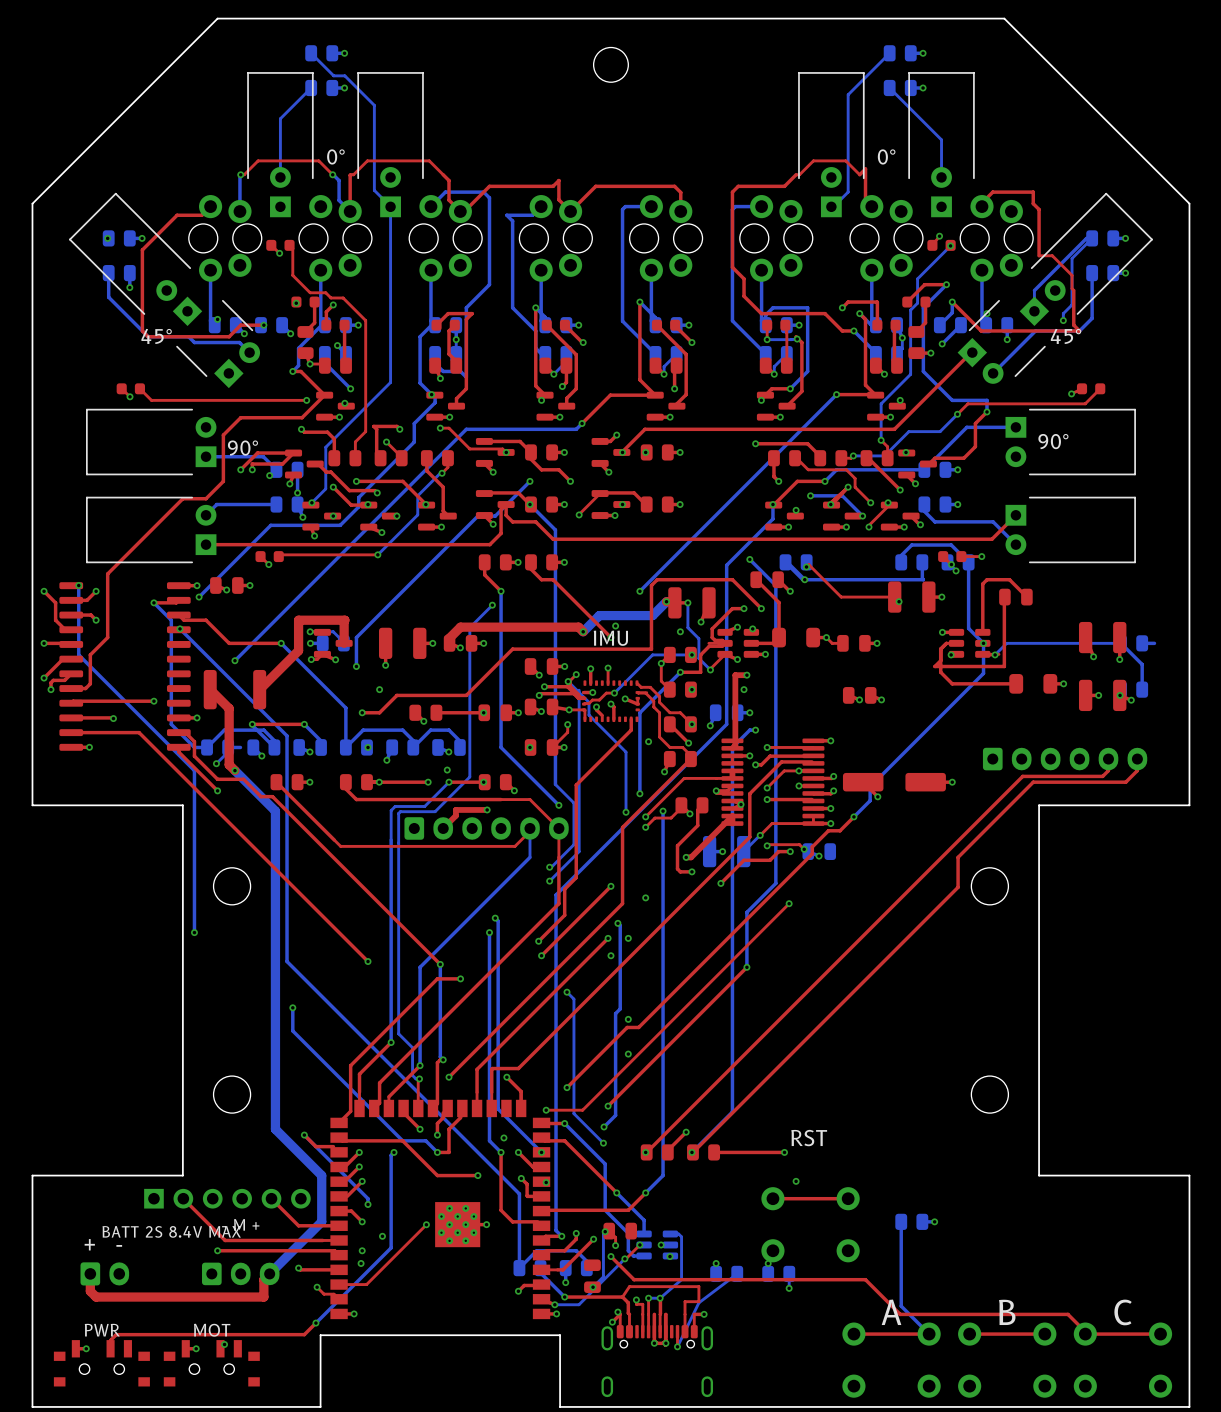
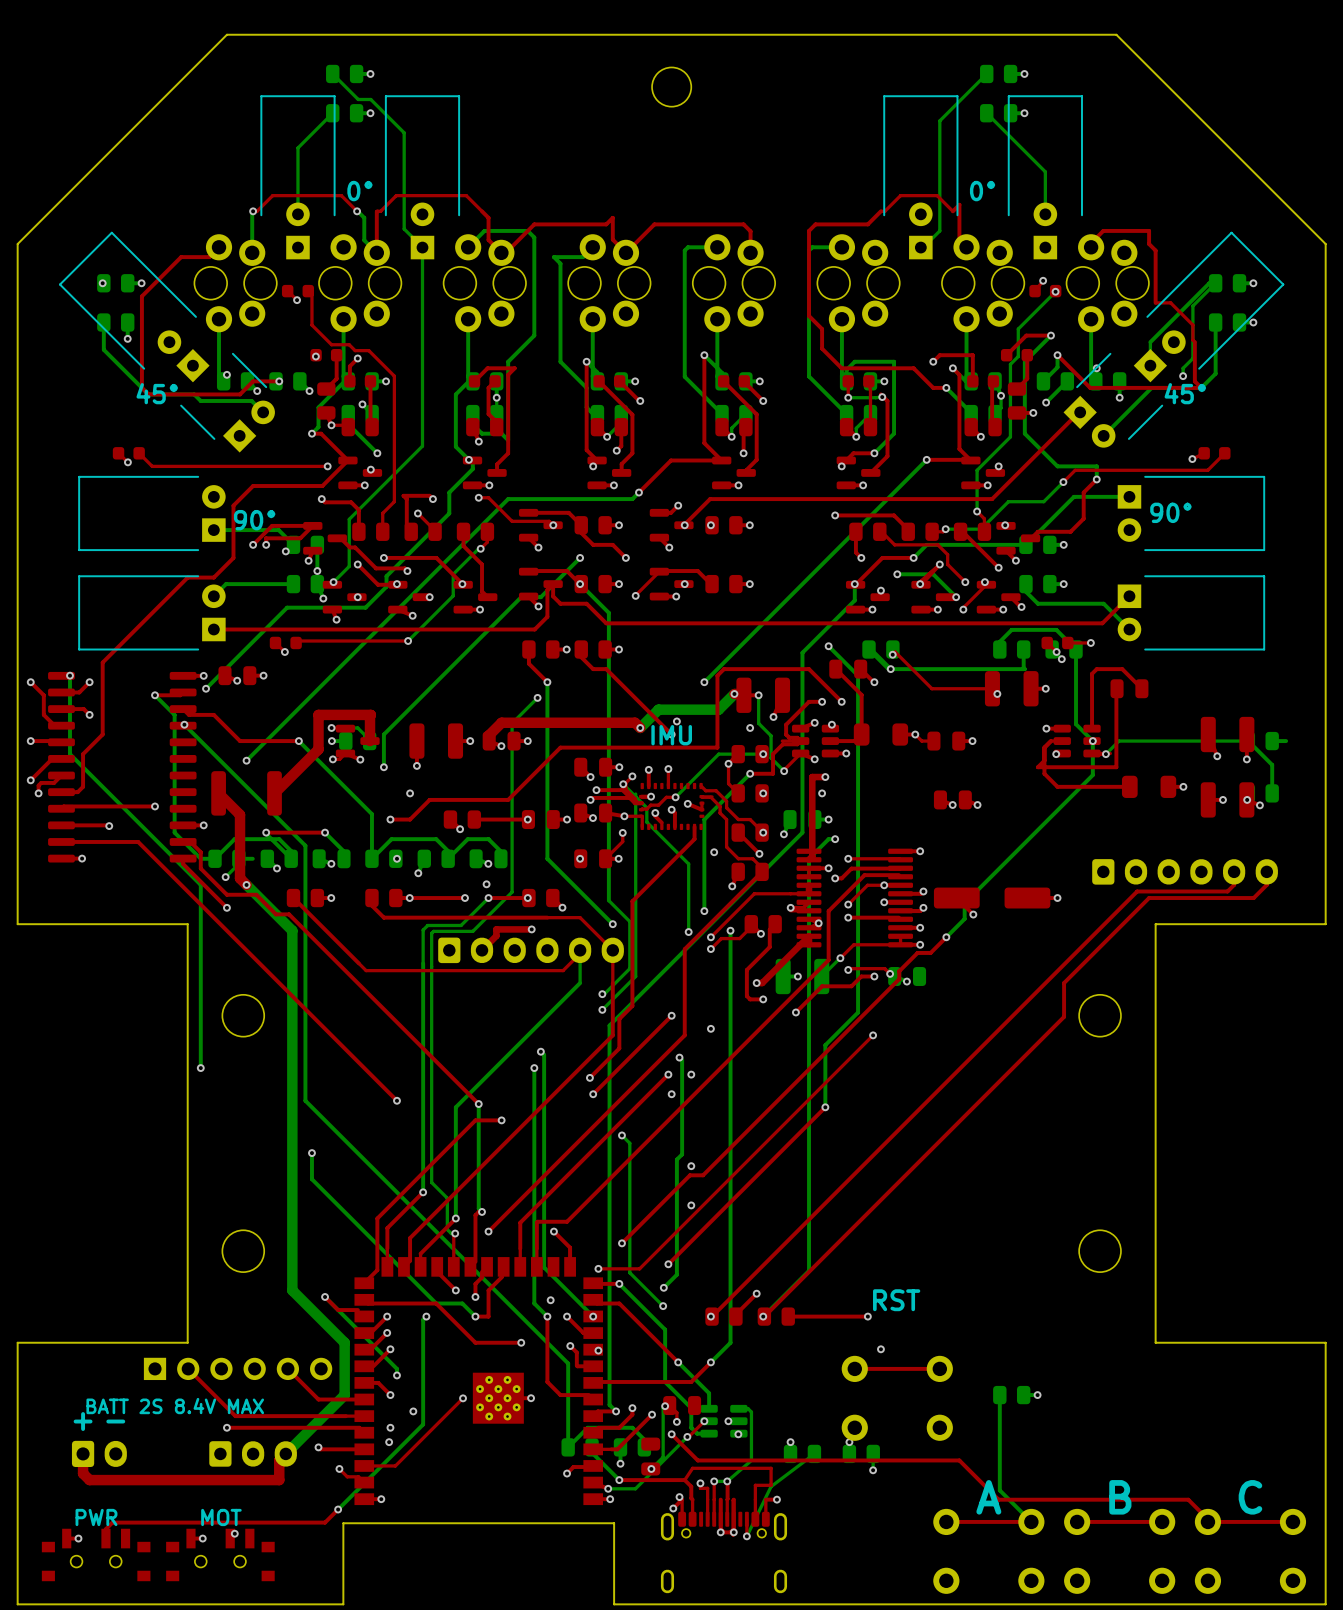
text: - M + (240, 1224) -> none

